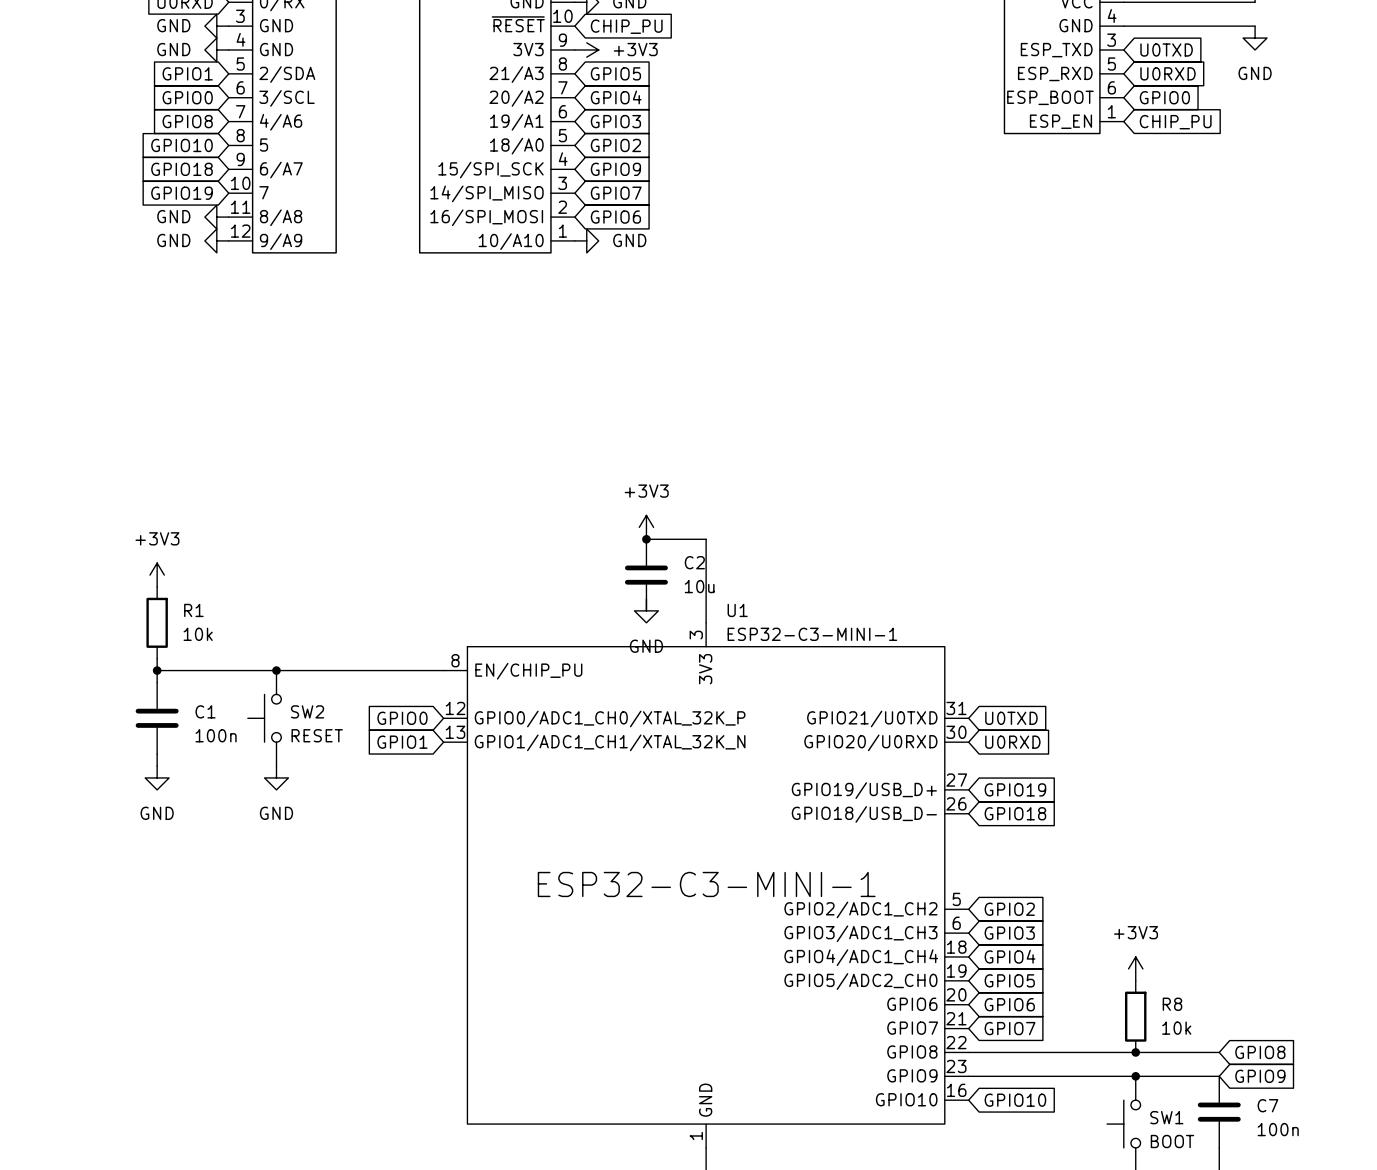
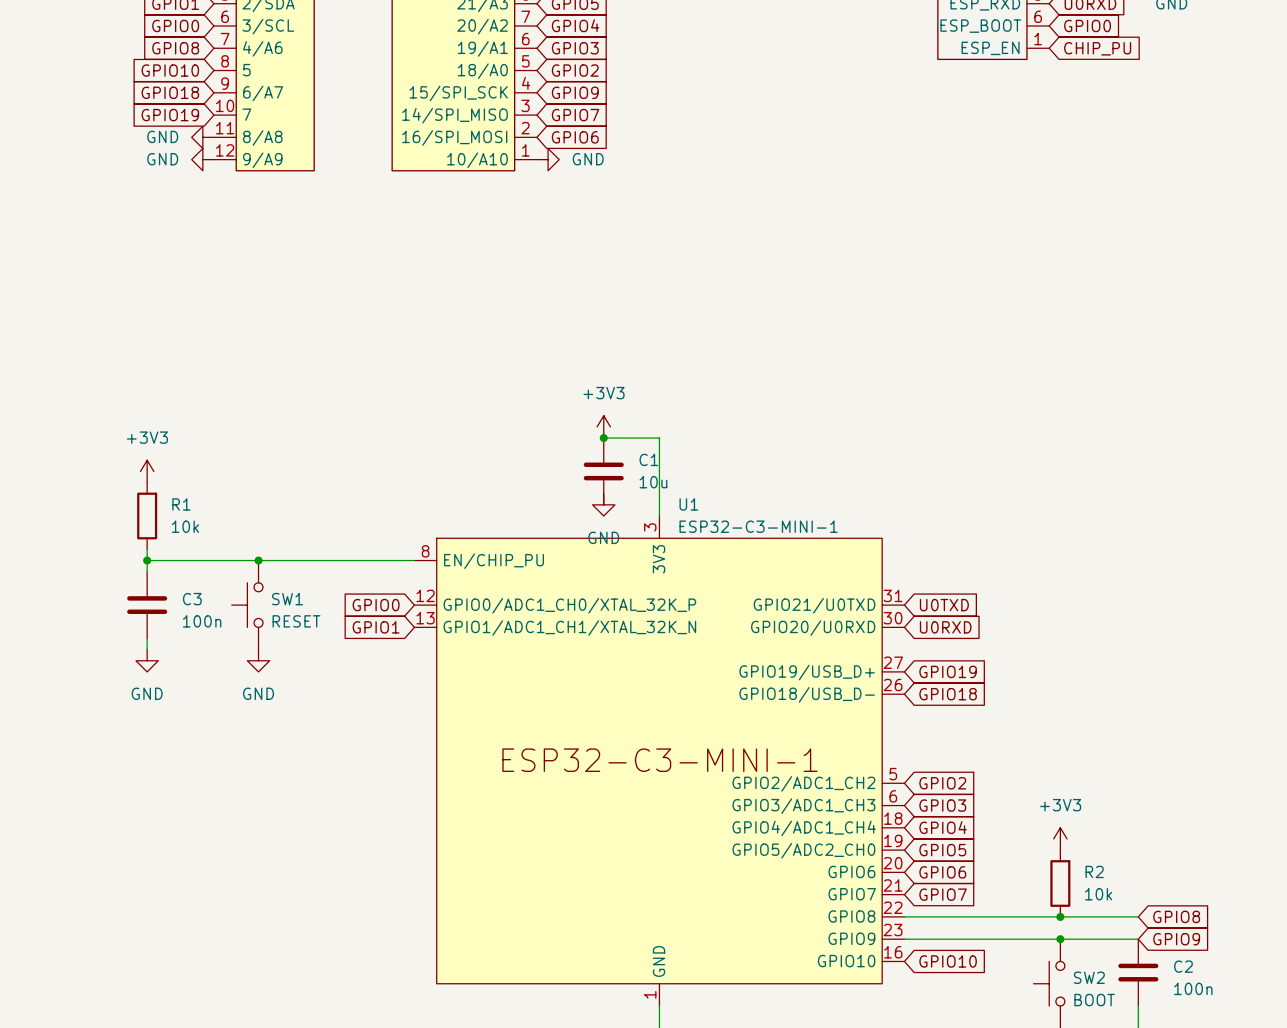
C2 name: C2 (694, 562) -> C1 (648, 459)
C1 name: C1 (205, 711) -> C3 (192, 599)
SW2 name: SW2 (307, 711) -> SW1 (287, 599)
R8 name: R8 (1172, 1004) -> R2 (1094, 871)
C7 name: C7 (1267, 1105) -> C2 (1183, 966)
SW1 name: SW1 (1166, 1117) -> SW2 (1089, 977)

